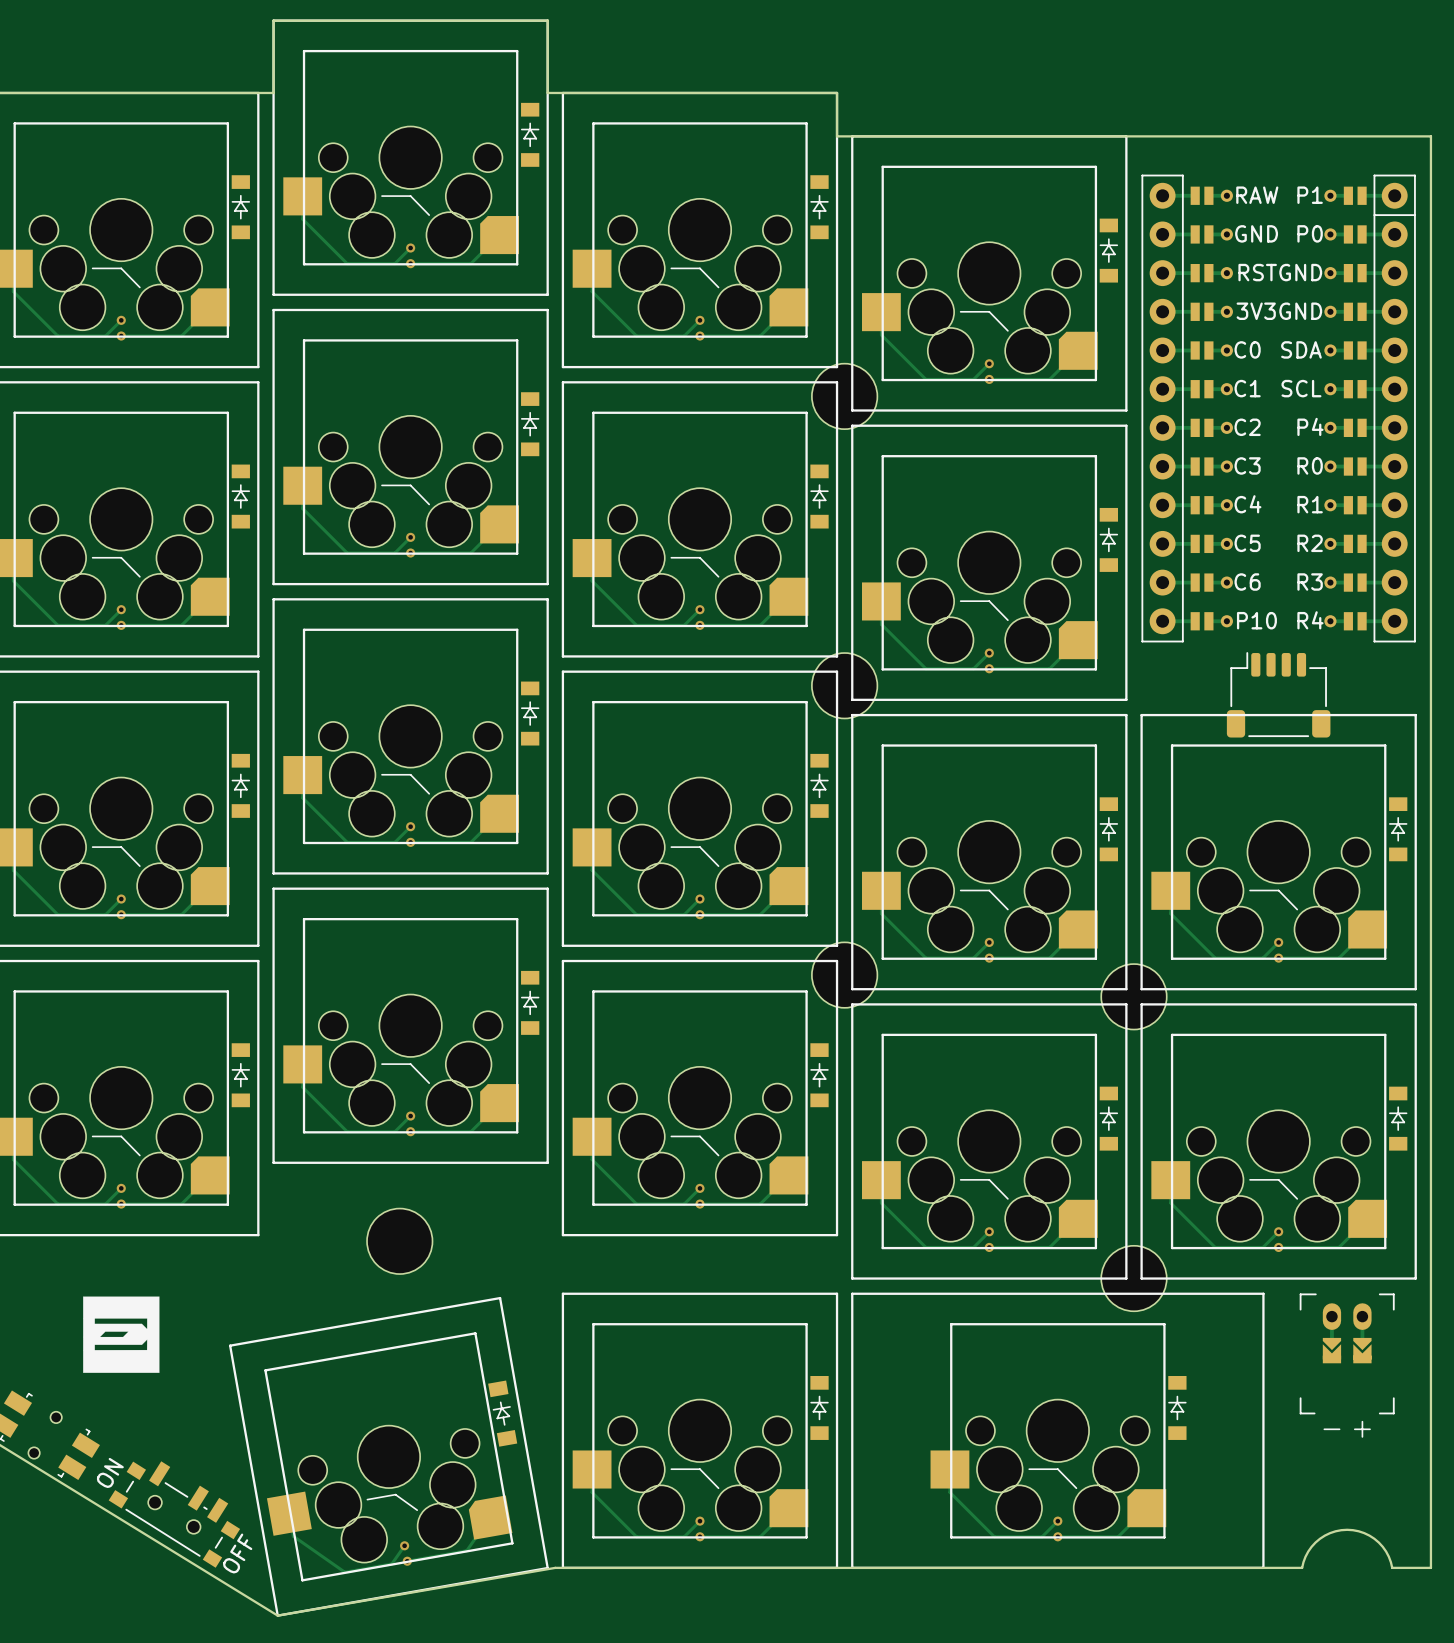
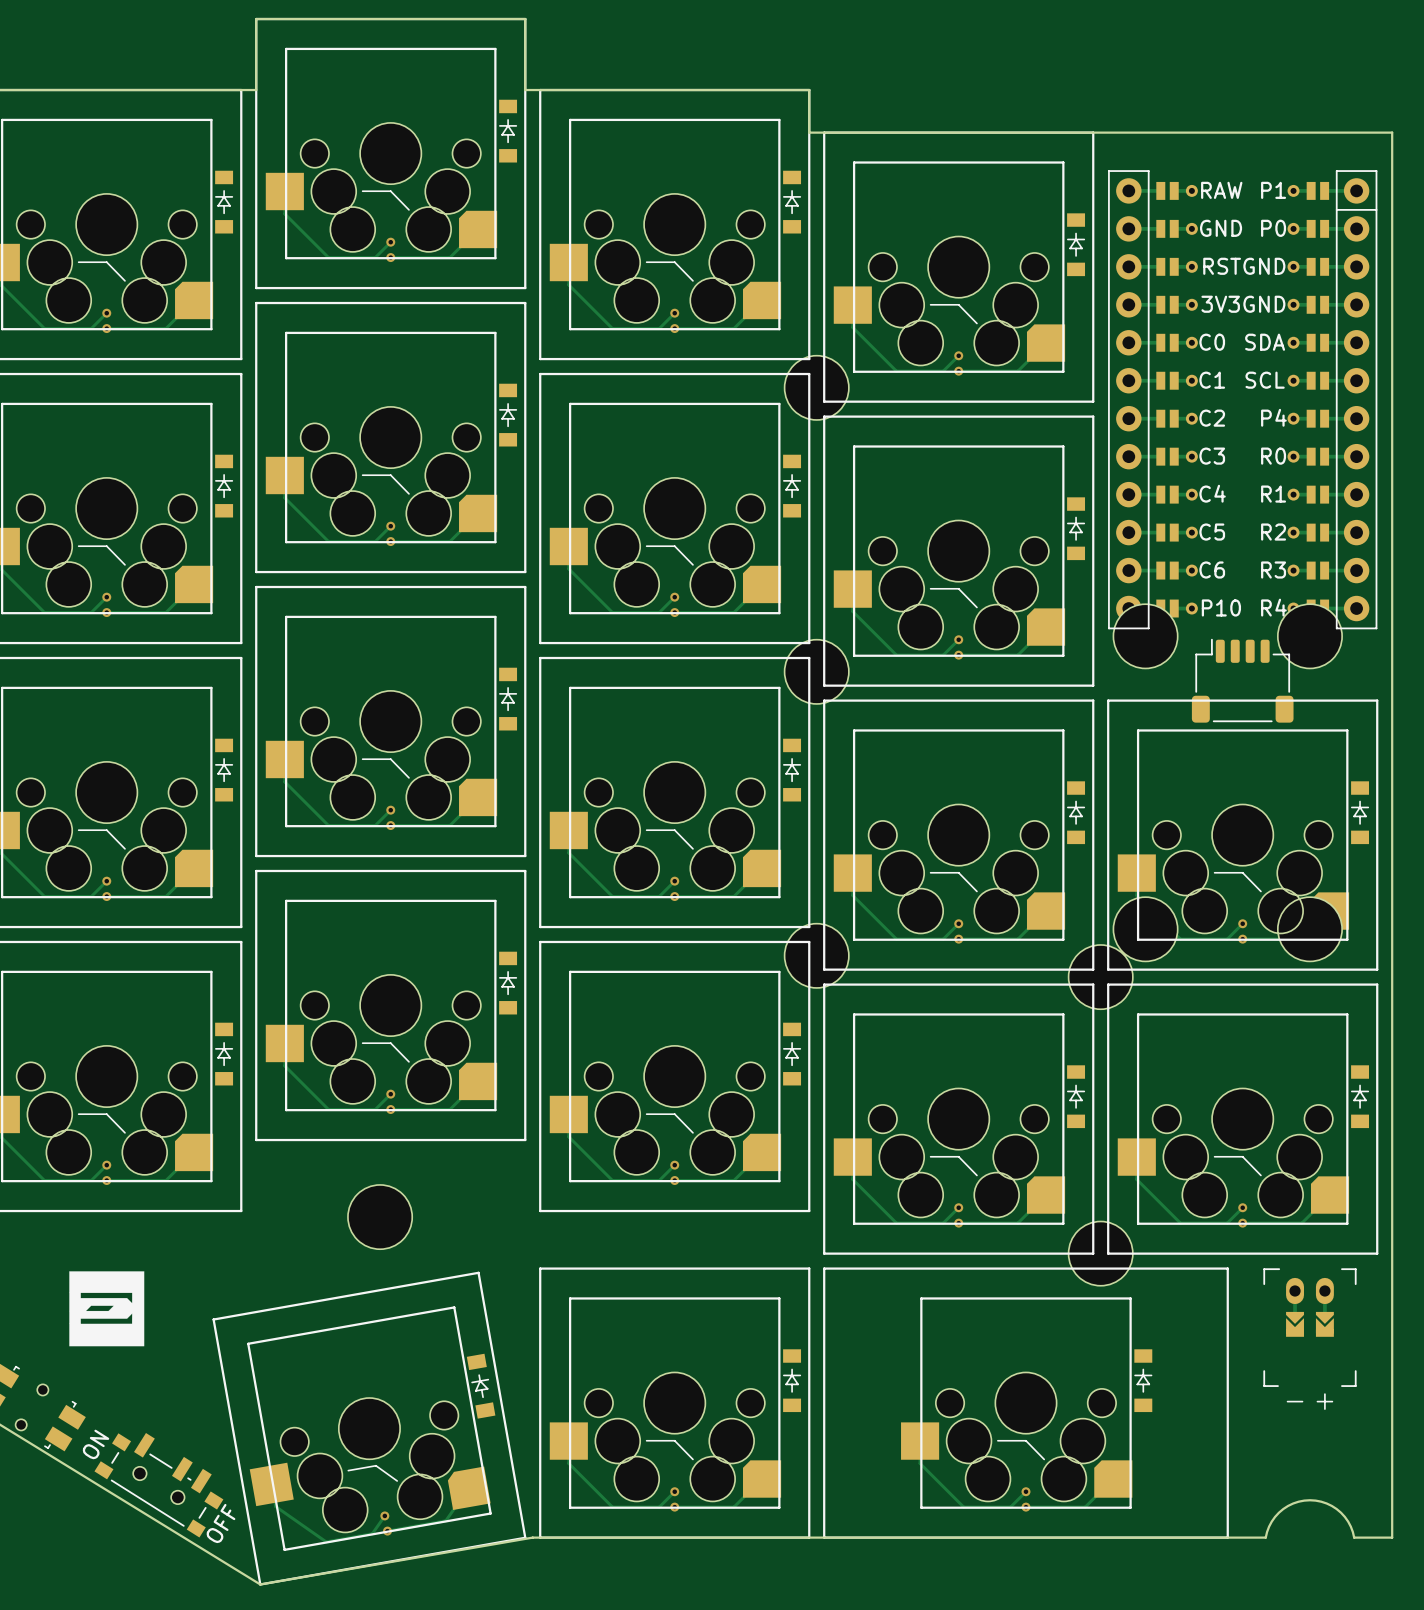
part: none -> (1145, 636)
part: none -> (1309, 636)
part: none -> (1145, 929)
part: none -> (1309, 929)

